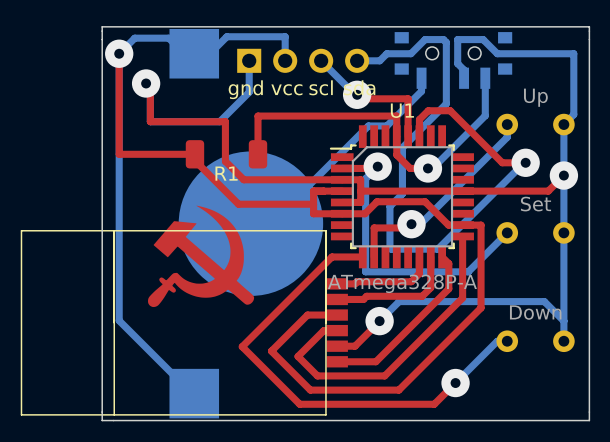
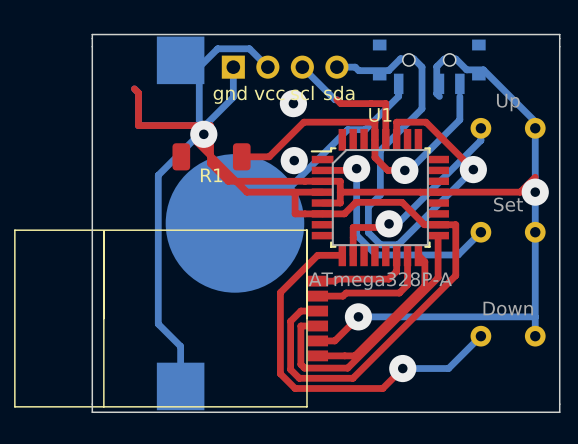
top track: (119, 53) (119, 154) (194, 154) (194, 160) (238, 204) (313, 204) -> none
via: (119, 53) -> none
bottom track: (213, 60) (213, 49) (226, 36) (285, 36) (285, 60) -> (199, 67) (217, 48) (249, 48) (267, 67)
bottom track: (376, 60) (379, 60) (386, 53) (410, 53) (425, 39) (443, 39) (446, 42) (445, 104) -> (355, 67) (358, 70) (388, 70) (400, 58) (413, 58) (422, 67) (422, 108)
bottom track: (194, 63) (168, 38) (134, 38) (119, 53) (119, 320) (182, 383) (194, 383) -> (199, 134) (158, 175) (158, 324) (180, 346) (180, 376)
bottom track: none -> (199, 69) (199, 134)
bottom track: (464, 78) (464, 70) (457, 63) (457, 39) (483, 39) (497, 53) (573, 53) (573, 114) (563, 124) -> (439, 96) (436, 93) (436, 66) (444, 59) (455, 59) (466, 69) (483, 69) (535, 121) (535, 128)
via: (146, 83) -> none
via: (357, 94) -> none
via: none -> (293, 103)
top track: (396, 118) (396, 116) (257, 116) (257, 154) -> (374, 122) (303, 122) (269, 156) (241, 156)
top track: (419, 119) (428, 110) (450, 110) (502, 162) (525, 162) -> (396, 123) (425, 122) (473, 169)
via: none -> (203, 134)
top track: none -> (196, 141) (246, 192) (295, 192)
via: none -> (294, 160)
bottom track: (525, 162) (437, 249) (391, 249) (389, 233) -> (473, 169) (398, 244) (380, 244) (368, 232)
via: (525, 162) -> none
bottom track: (377, 166) (365, 178) (365, 271) (468, 271) (483, 256) -> (356, 168) (356, 235) (376, 254) (458, 254)
via: none -> (473, 169)
via position: (563, 175) -> (535, 192)
drawing: [148, 205, 255, 308] -> none
top track: (337, 256) (331, 256) (242, 346) (299, 404) (434, 404) (455, 383) -> (317, 255) (280, 292) (280, 373) (295, 388) (382, 388) (402, 368)
top track: (481, 278) (481, 307) (398, 390) (310, 390) (271, 351) (307, 315) (319, 315) -> (455, 275) (352, 378) (299, 378) (290, 369) (290, 321) (300, 311)
top track: (462, 280) (462, 298) (384, 375) (317, 375) (298, 356) (323, 330) -> (438, 277) (347, 368) (304, 368) (300, 364) (300, 325) (304, 325)
bottom track: (379, 321) (399, 301) (544, 301) (563, 321) -> (356, 315) (358, 316) (535, 316)
bottom track: (507, 341) (497, 341) (455, 383) -> (480, 336) (448, 368) (402, 368)
via position: (455, 383) -> (402, 368)

